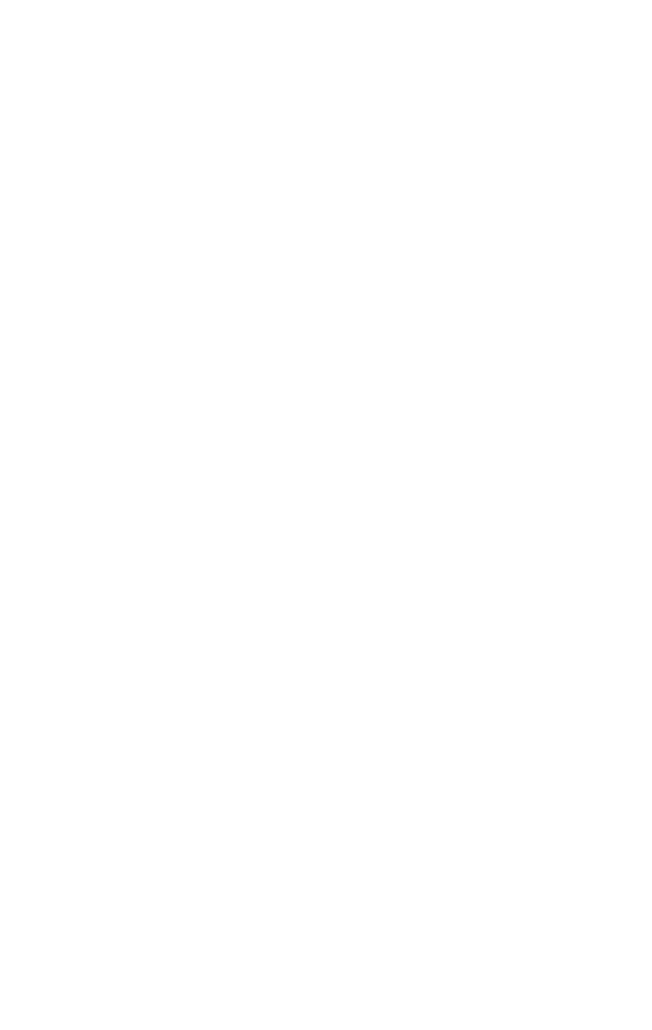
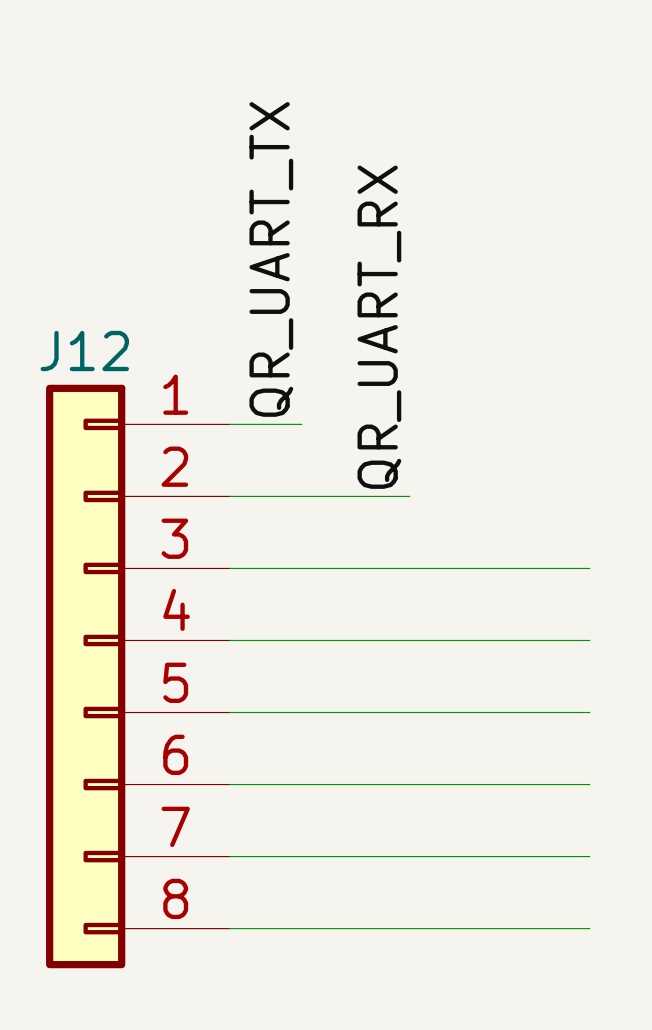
label: none -> QR_UART_TX (271, 259)
label: none -> QR_UART_RX (379, 327)
wire: none -> (229, 424) (301, 424)
wire: none -> (229, 496) (409, 496)
wire: none -> (229, 568) (589, 568)
wire: none -> (229, 640) (589, 640)
J12: none -> (137, 676)
wire: none -> (229, 712) (589, 712)
wire: none -> (229, 784) (589, 784)
wire: none -> (229, 856) (589, 856)
wire: none -> (229, 928) (589, 928)

